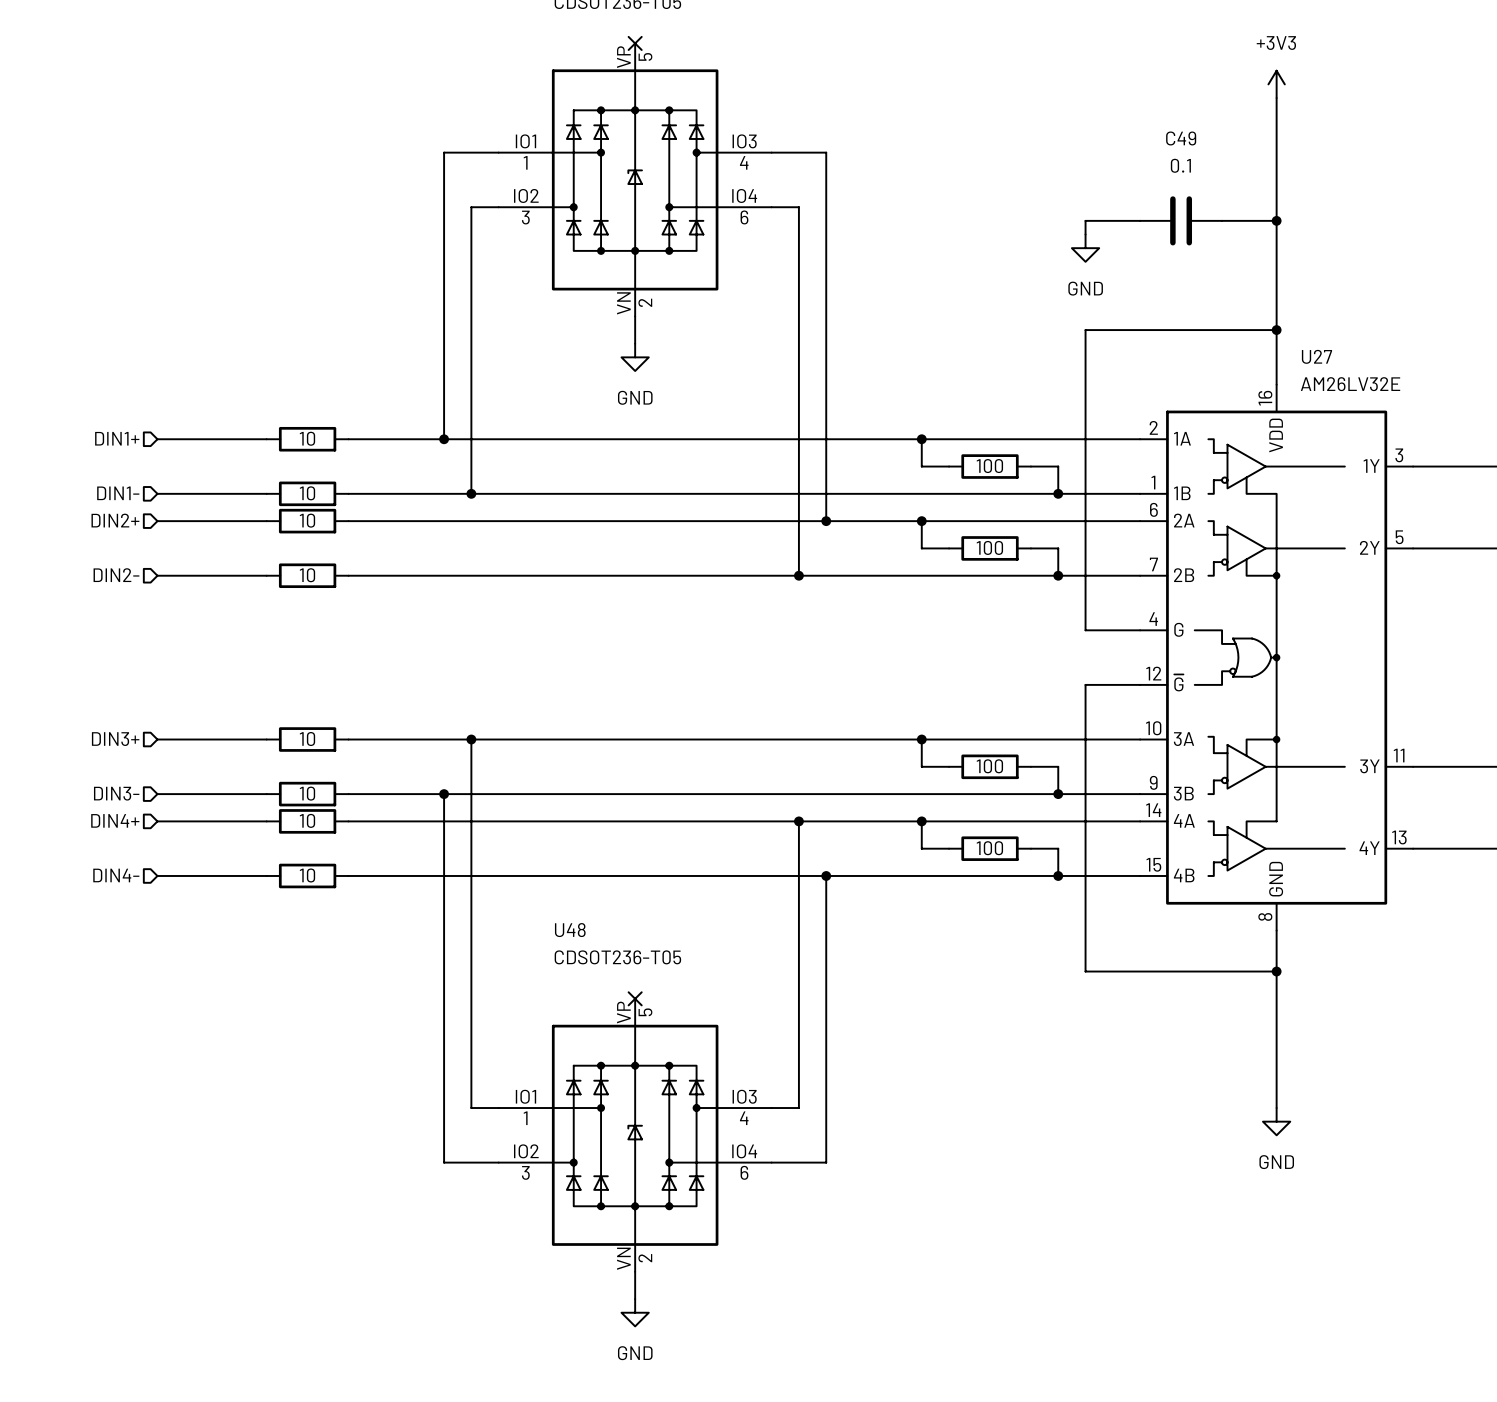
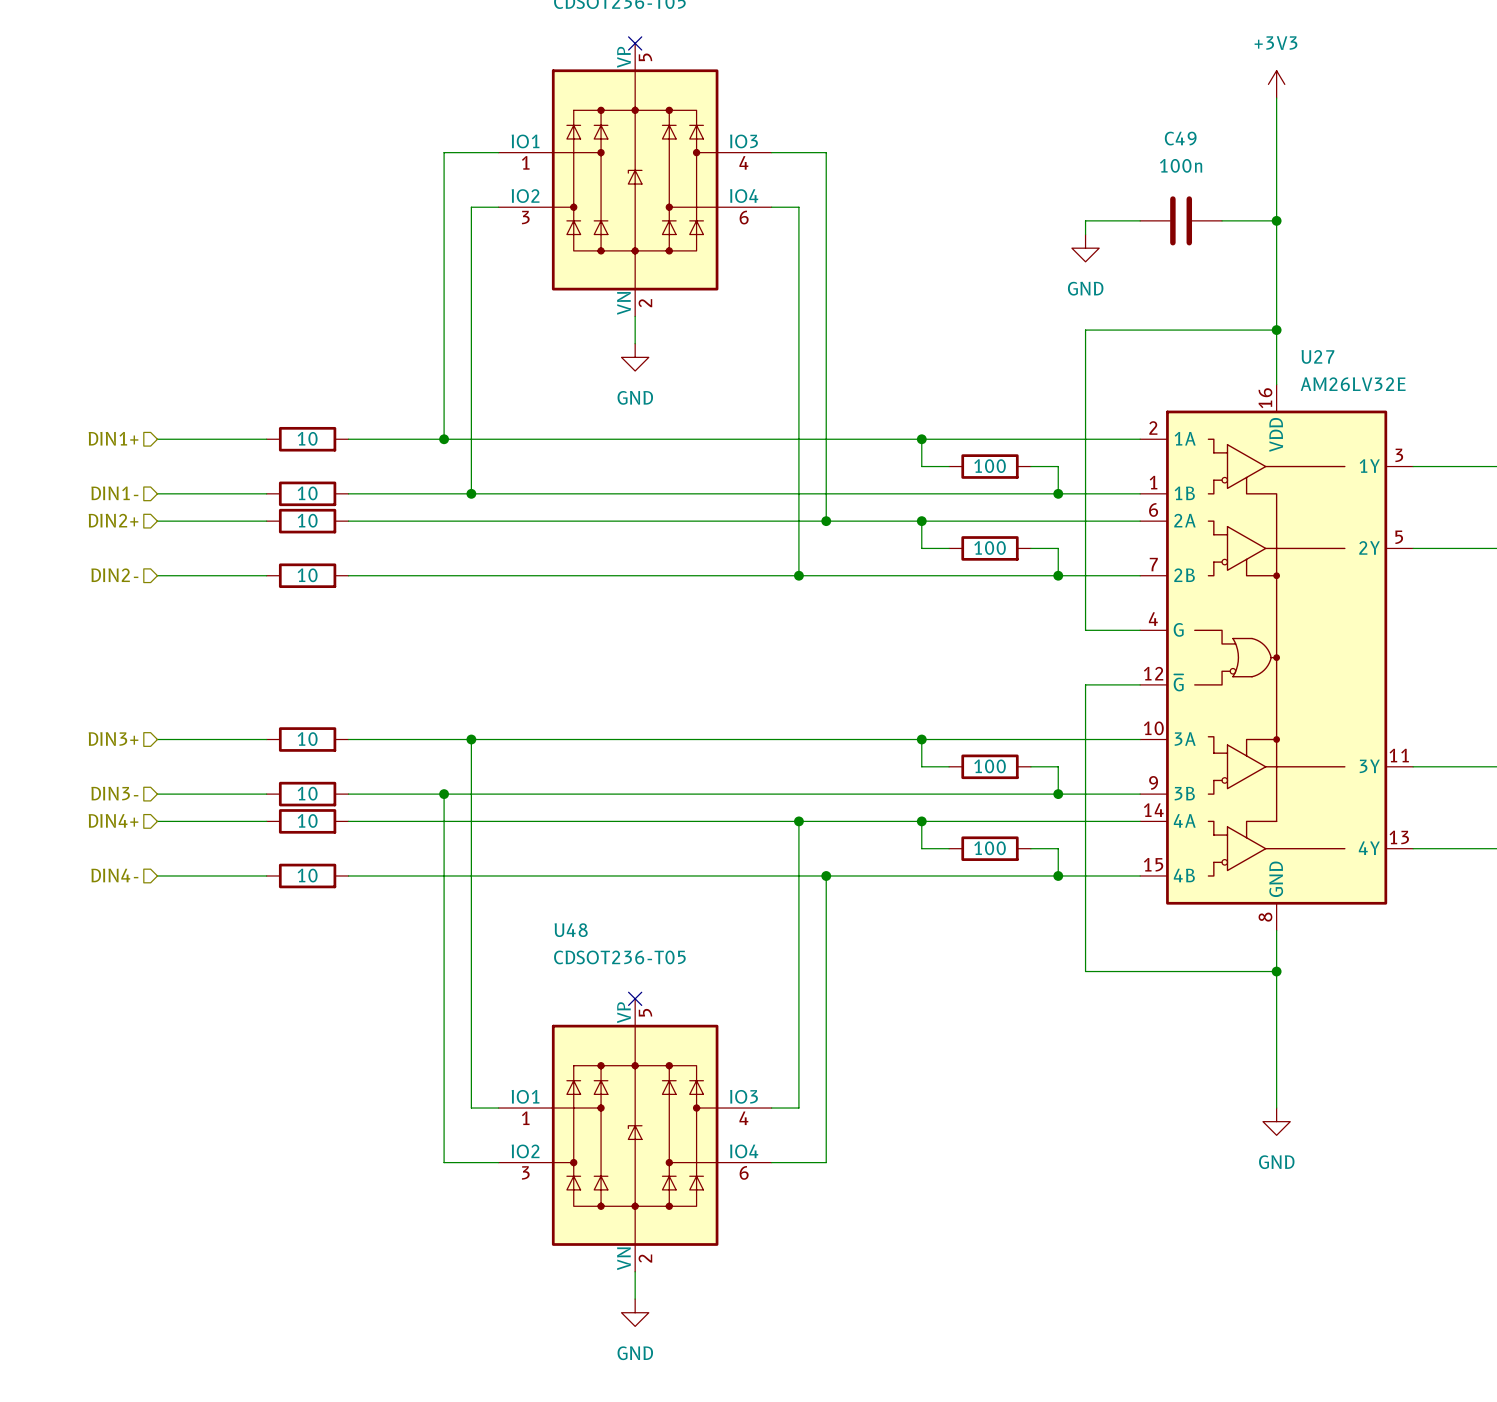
C49 value: 0.1 (1180, 165) -> 100n (1181, 165)

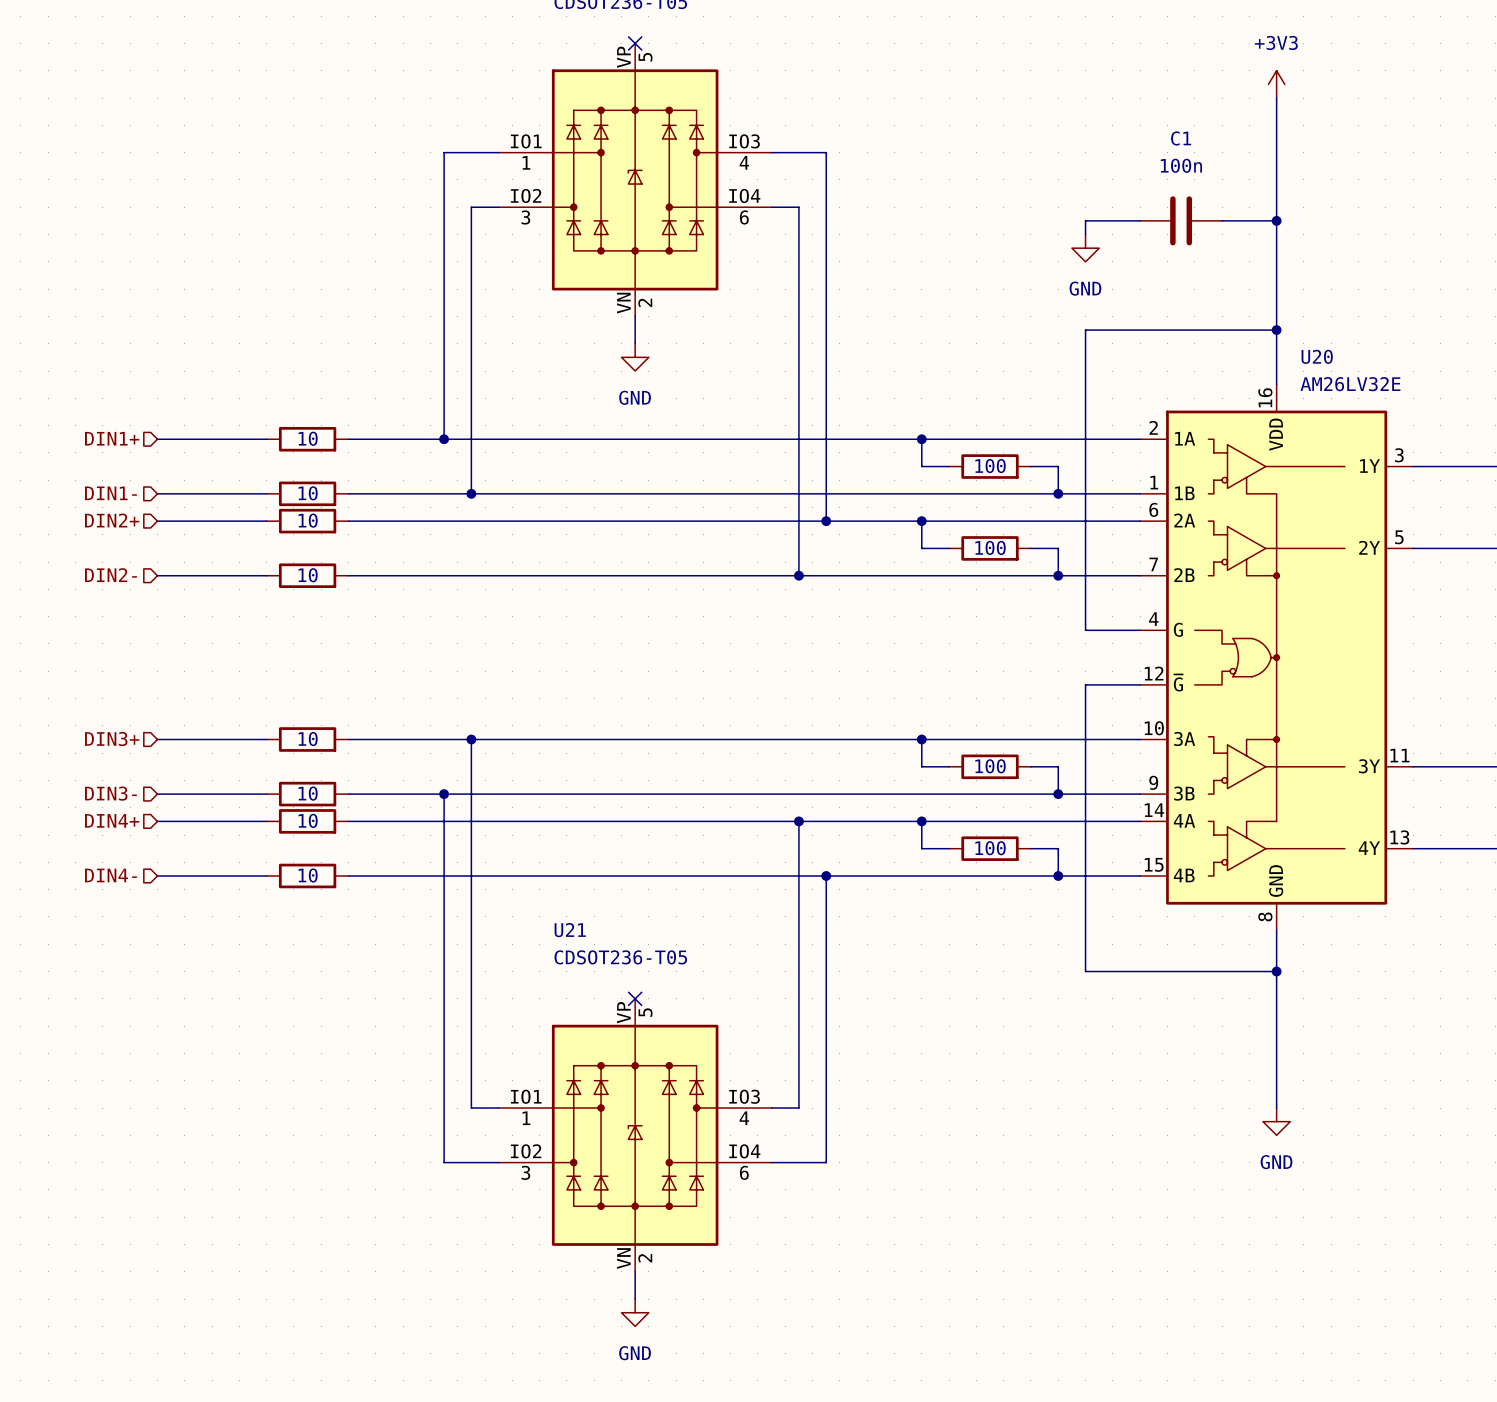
C49 name: C49 (1180, 138) -> C1 (1181, 138)
U27 name: U27 (1317, 356) -> U20 (1317, 356)
U48 name: U48 (571, 930) -> U21 (570, 930)

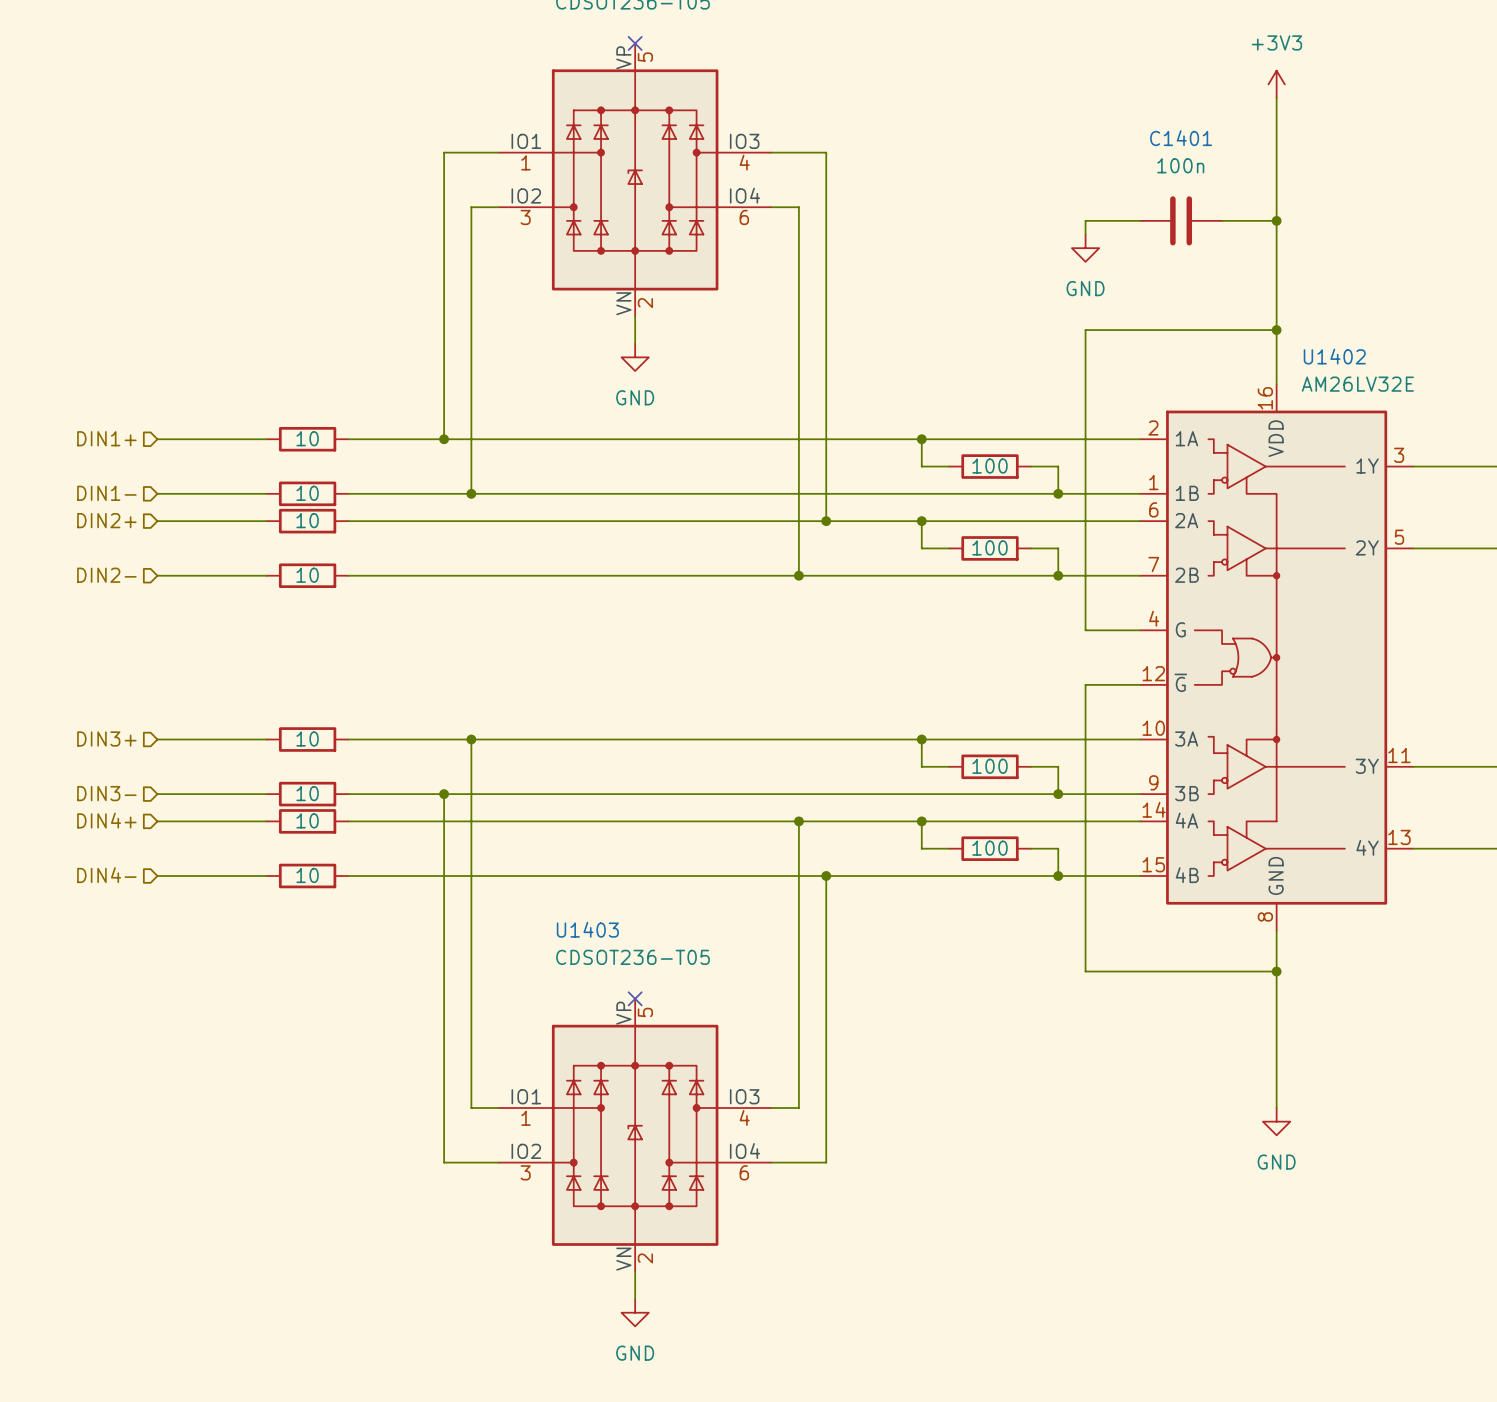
C1 name: C1 (1181, 138) -> C1401 (1181, 138)
U20 name: U20 (1317, 356) -> U1402 (1334, 356)
U21 name: U21 (570, 930) -> U1403 (587, 929)

